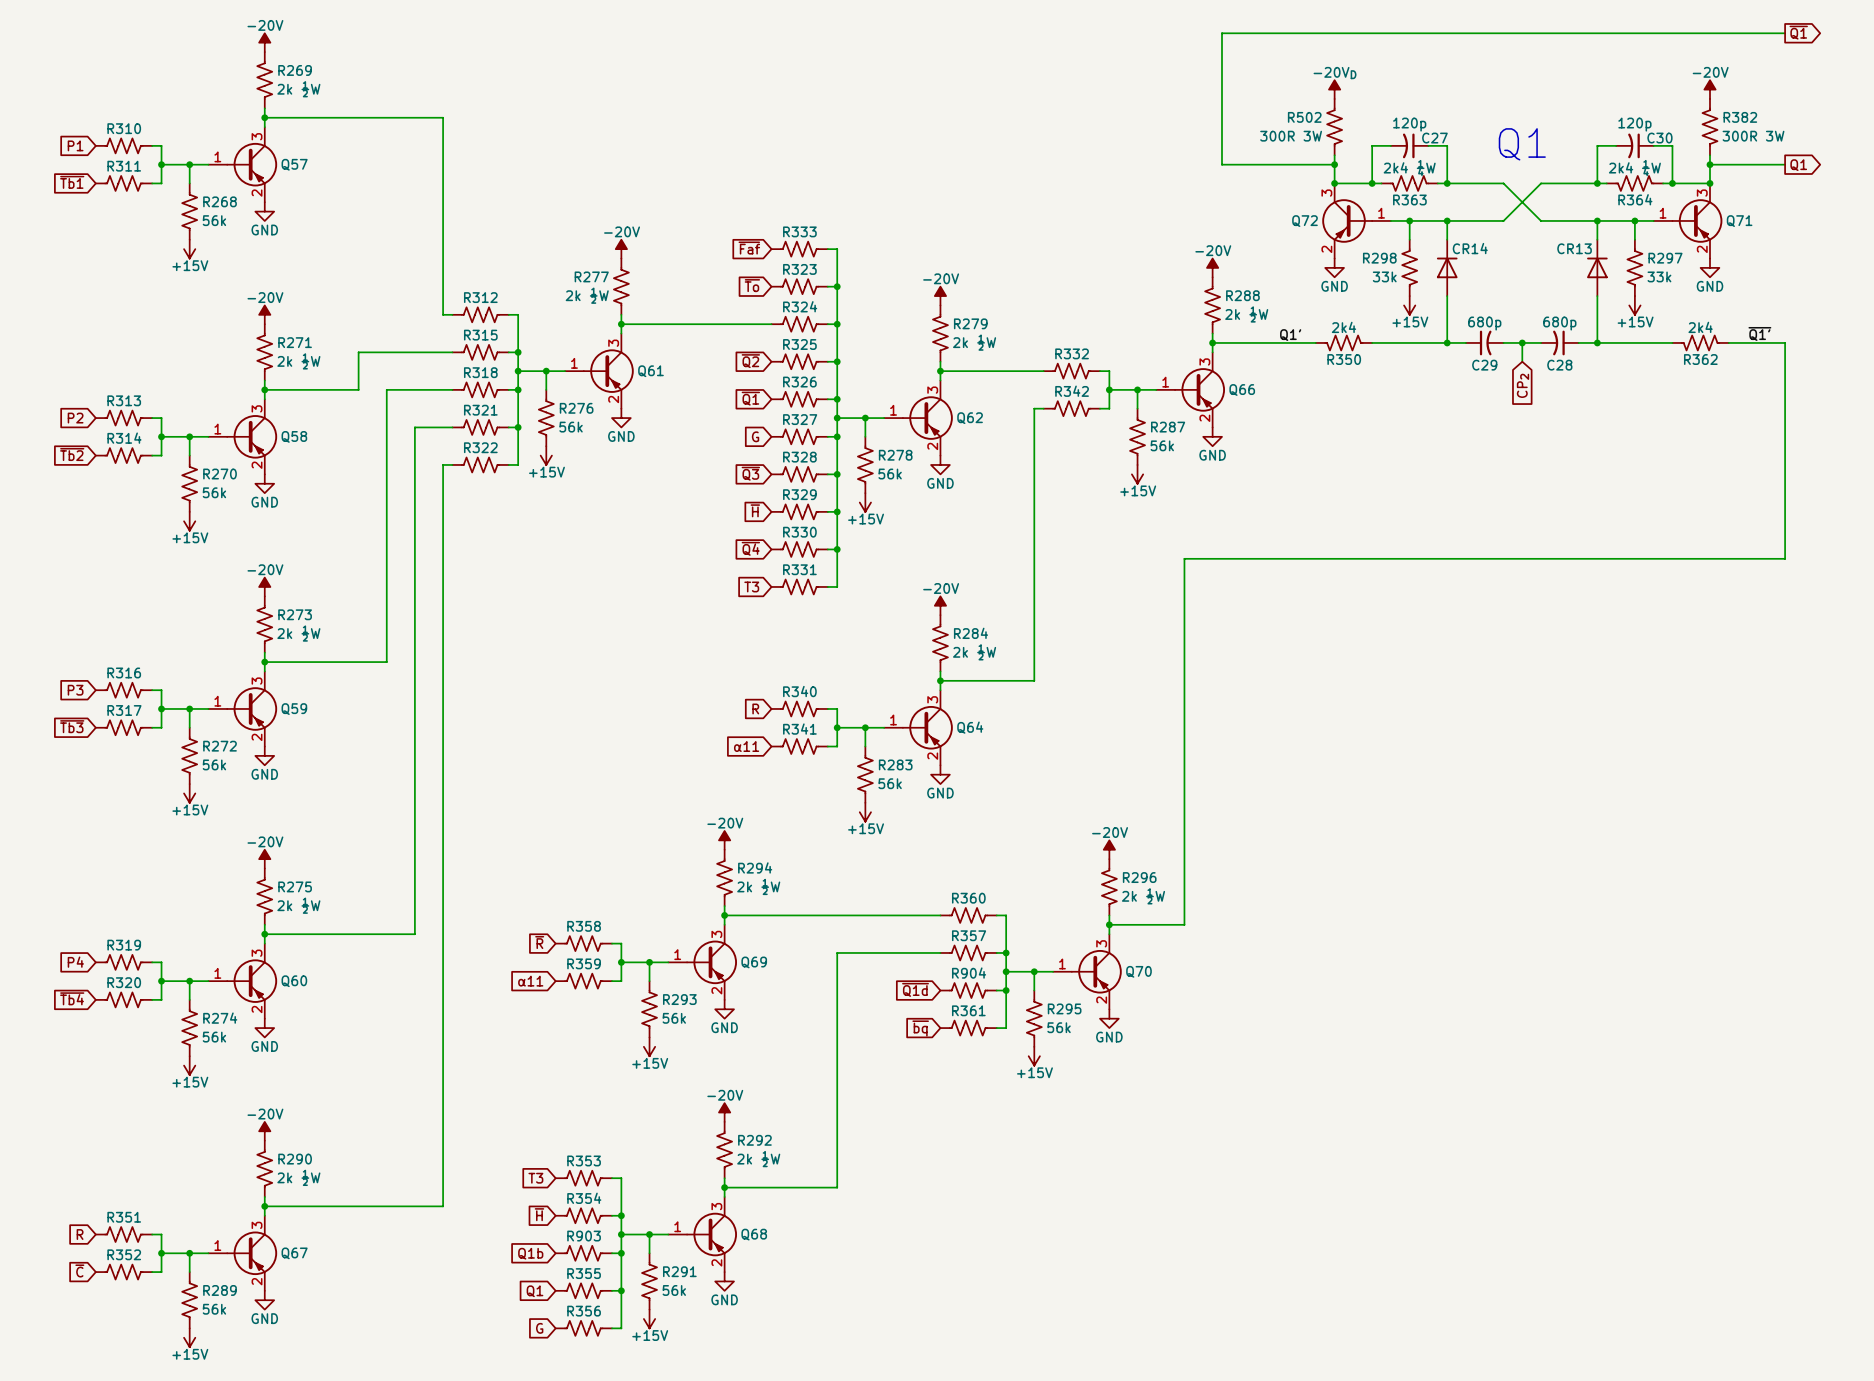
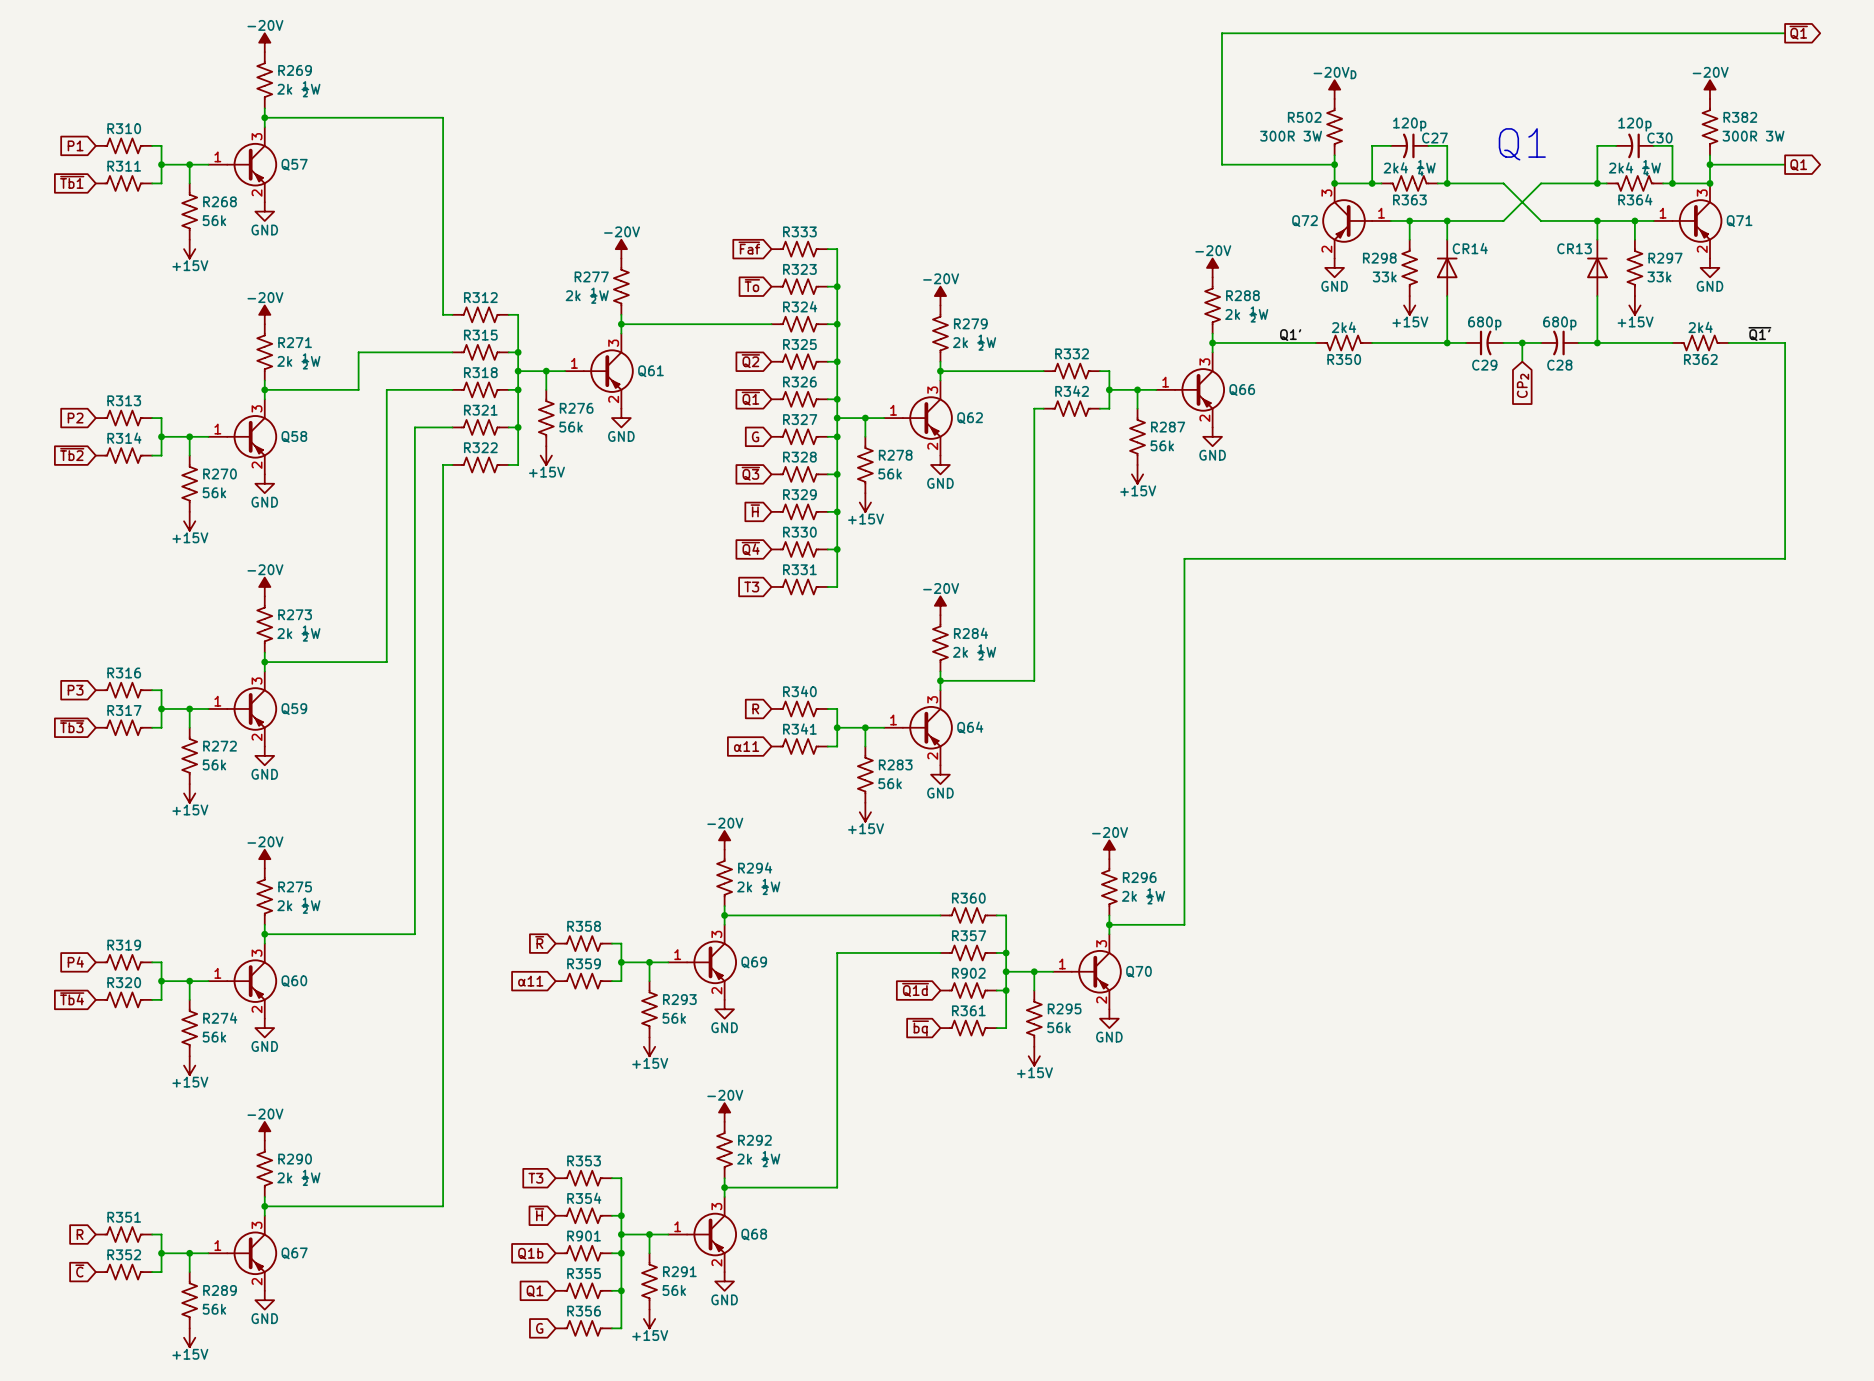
R904 name: R904 (969, 973) -> R902 (968, 973)
R903 name: R903 (584, 1236) -> R901 (584, 1236)

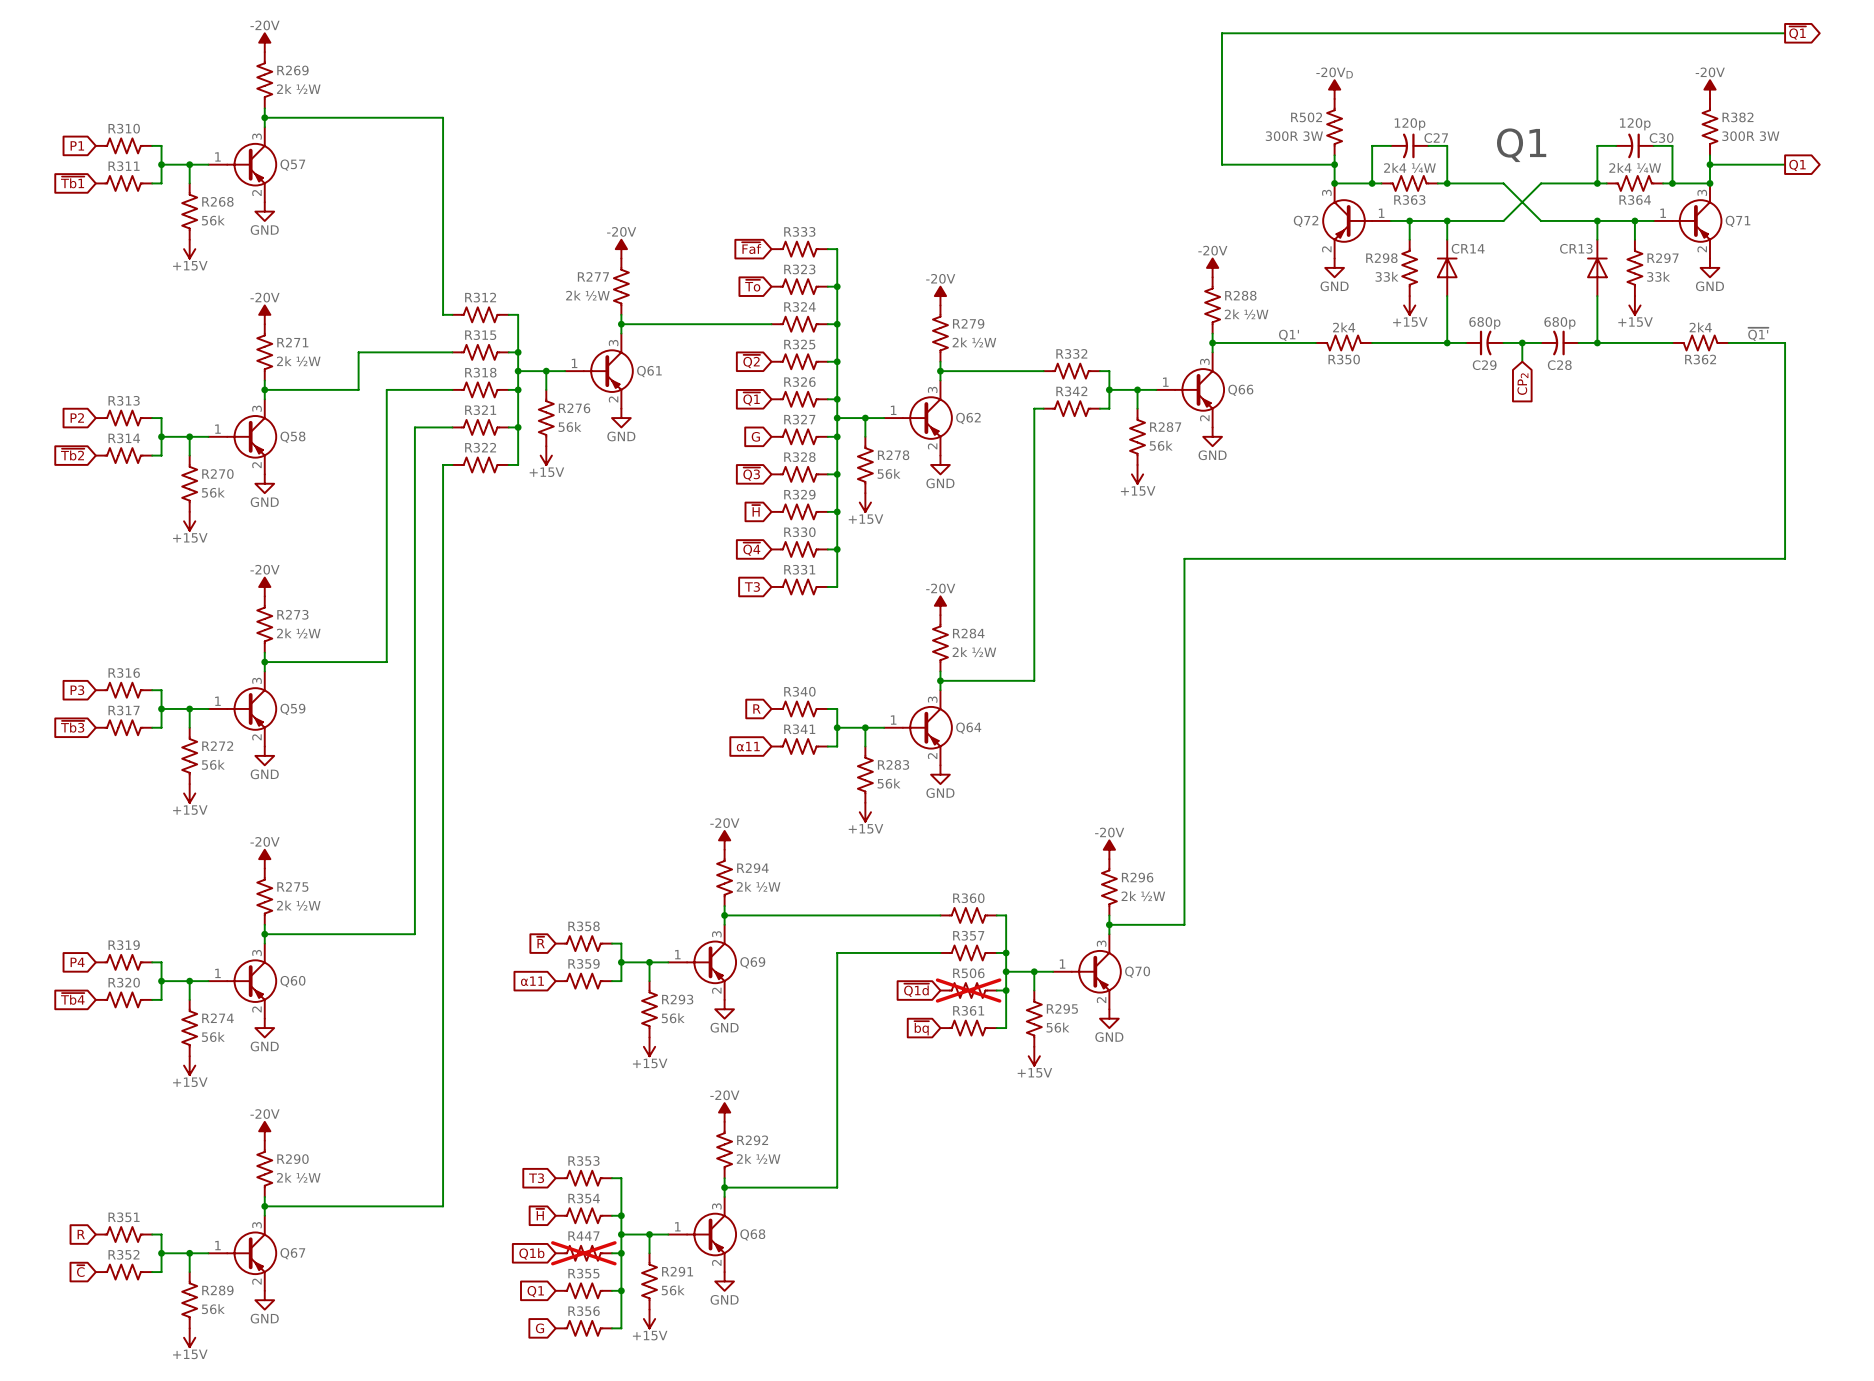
R902 name: R902 (968, 973) -> R506 (968, 973)
R902 do-not-place cross: none -> (968, 990)
R901 name: R901 (584, 1236) -> R447 (583, 1236)
R901 do-not-place cross: none -> (583, 1253)

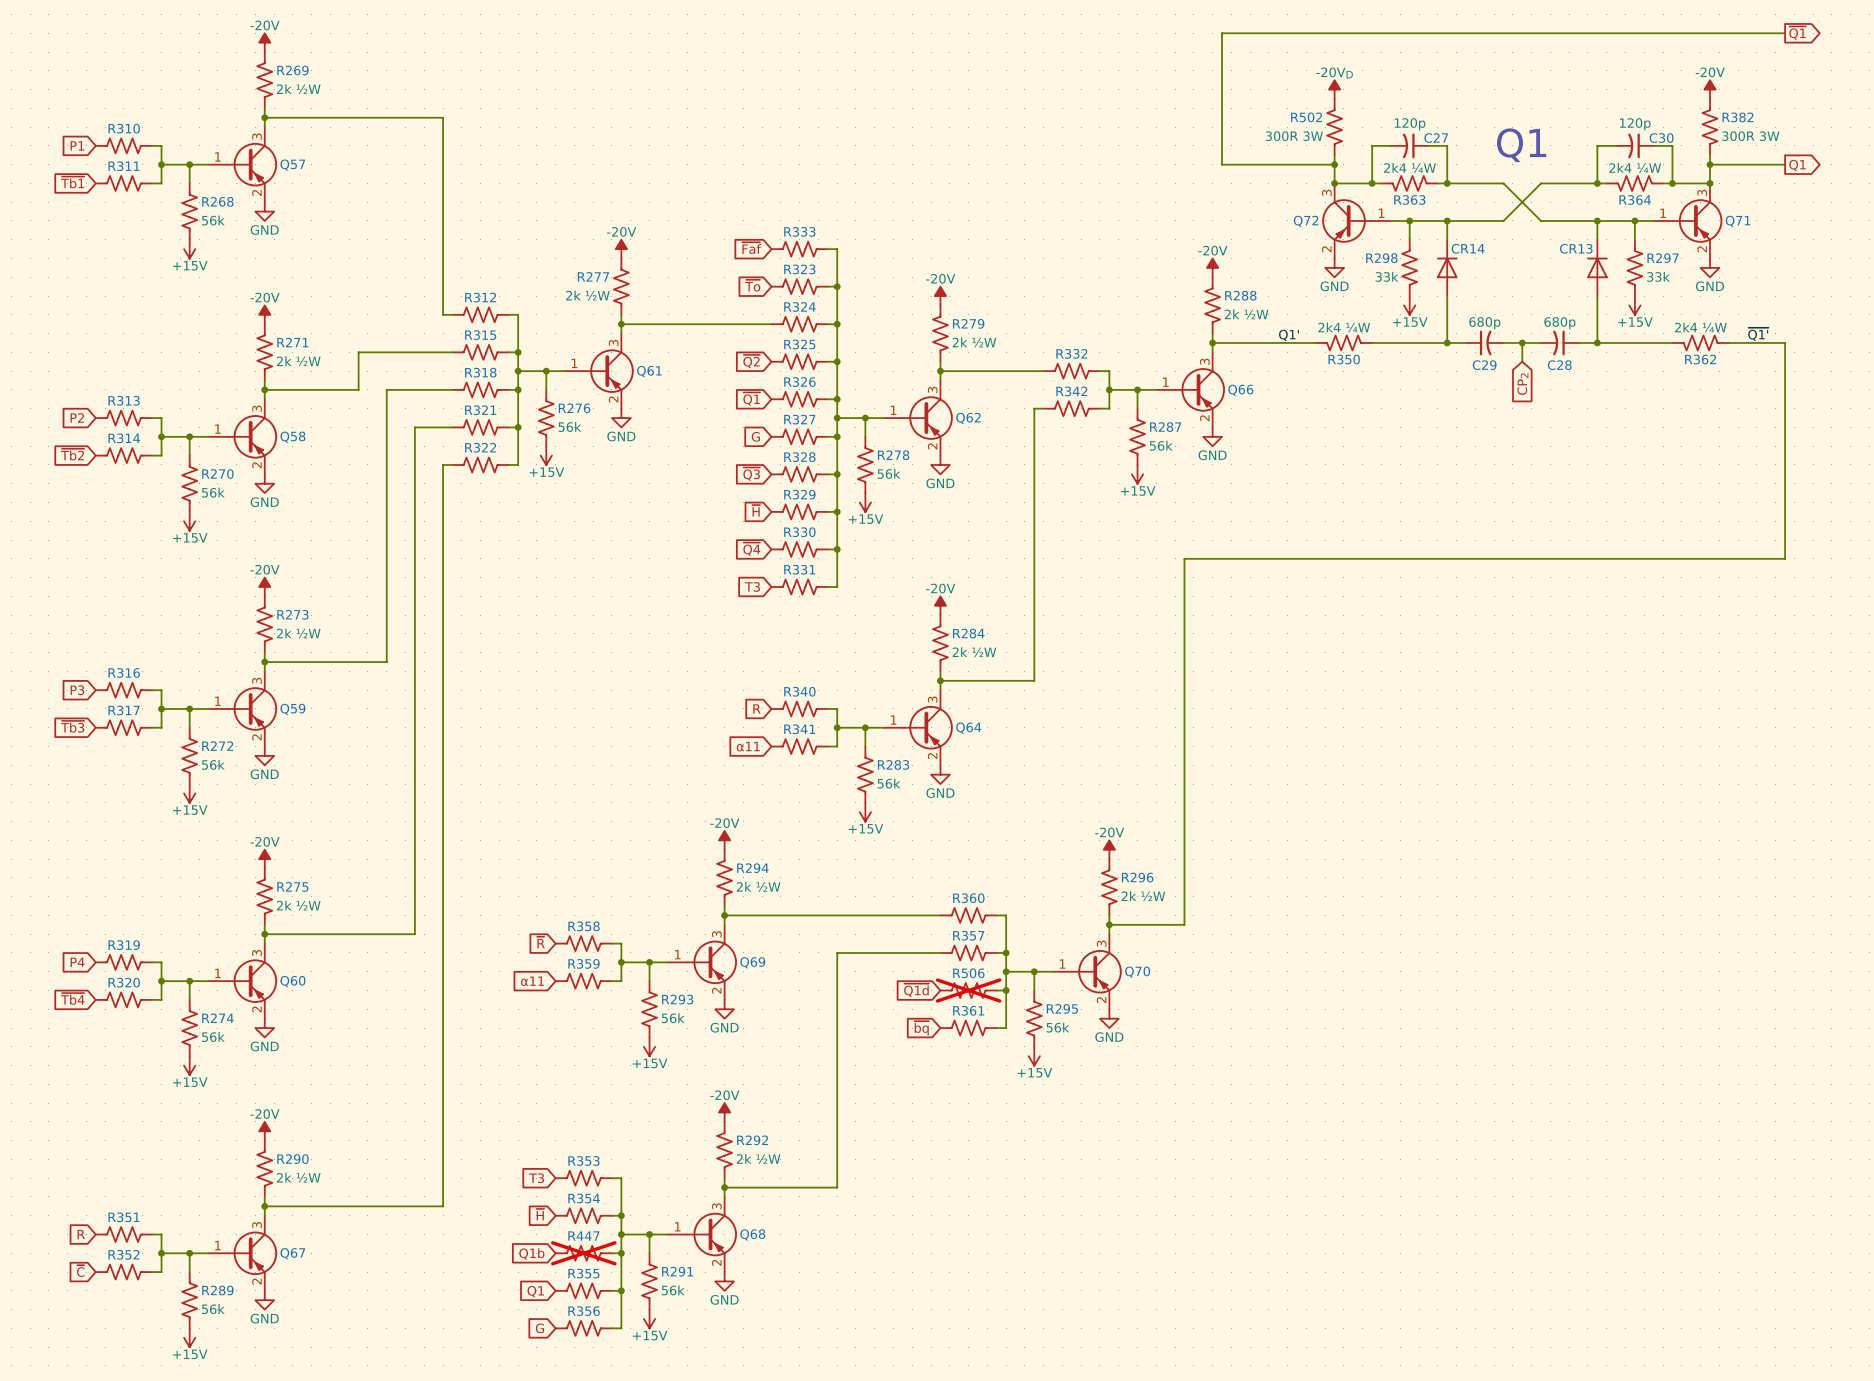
R350 value: 2k4 (1344, 327) -> 2k4 ¼W (1344, 327)
R362 value: 2k4 (1700, 327) -> 2k4 ¼W (1700, 327)

